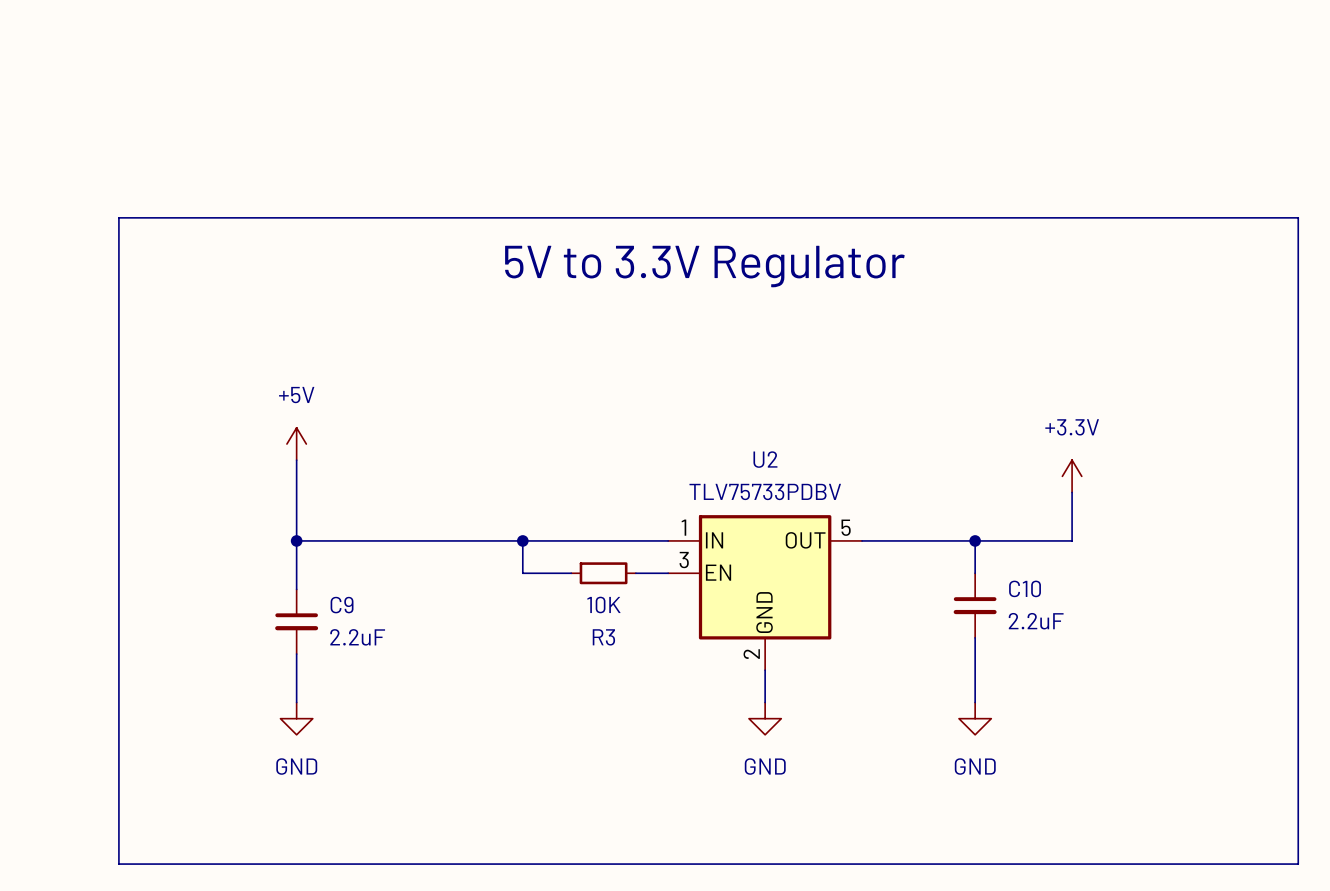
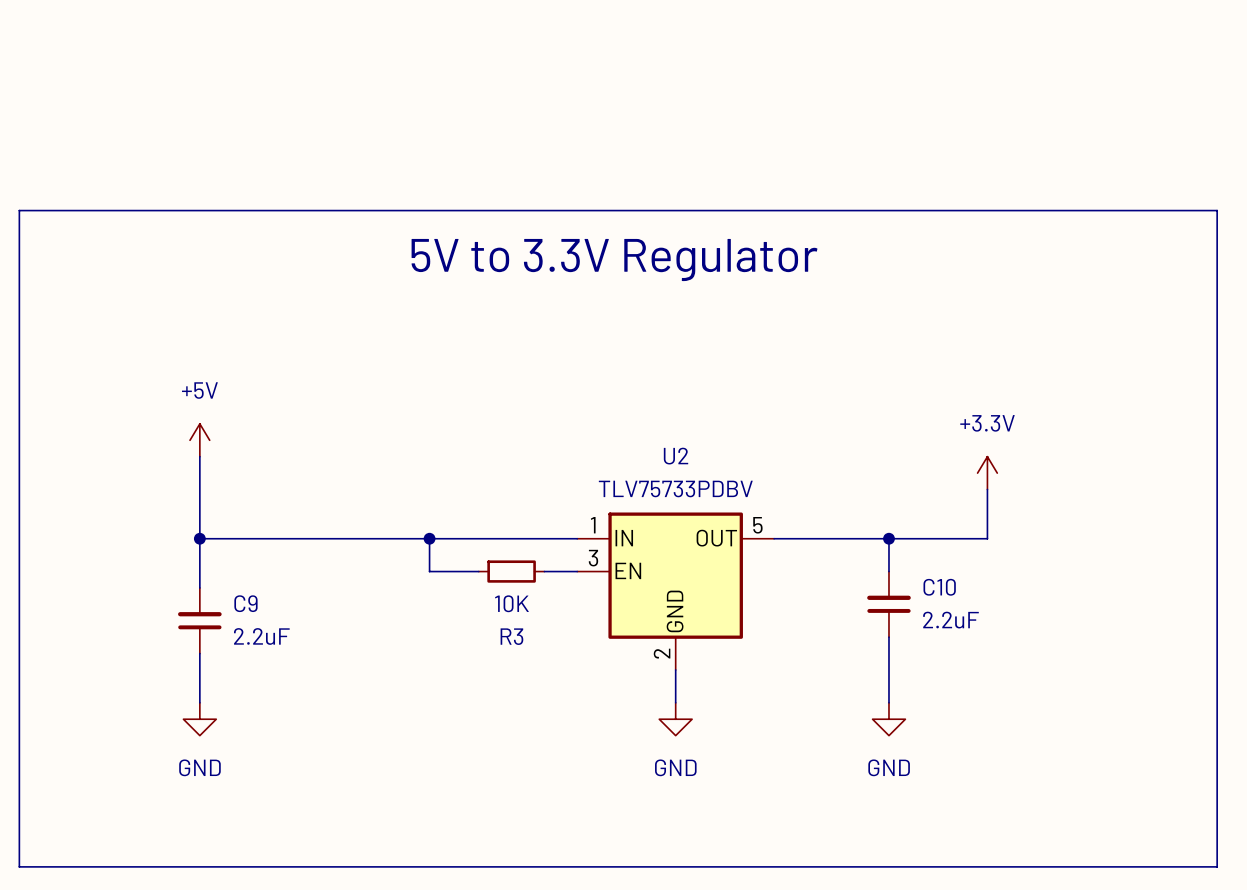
C10 rotation: 0° (975, 605) -> 180° (888, 604)
C9 rotation: 0° (296, 621) -> 180° (199, 620)

